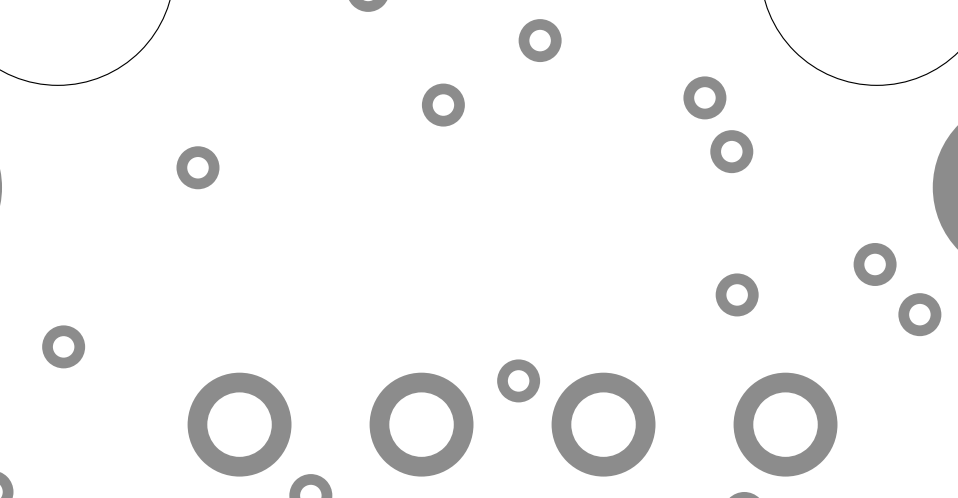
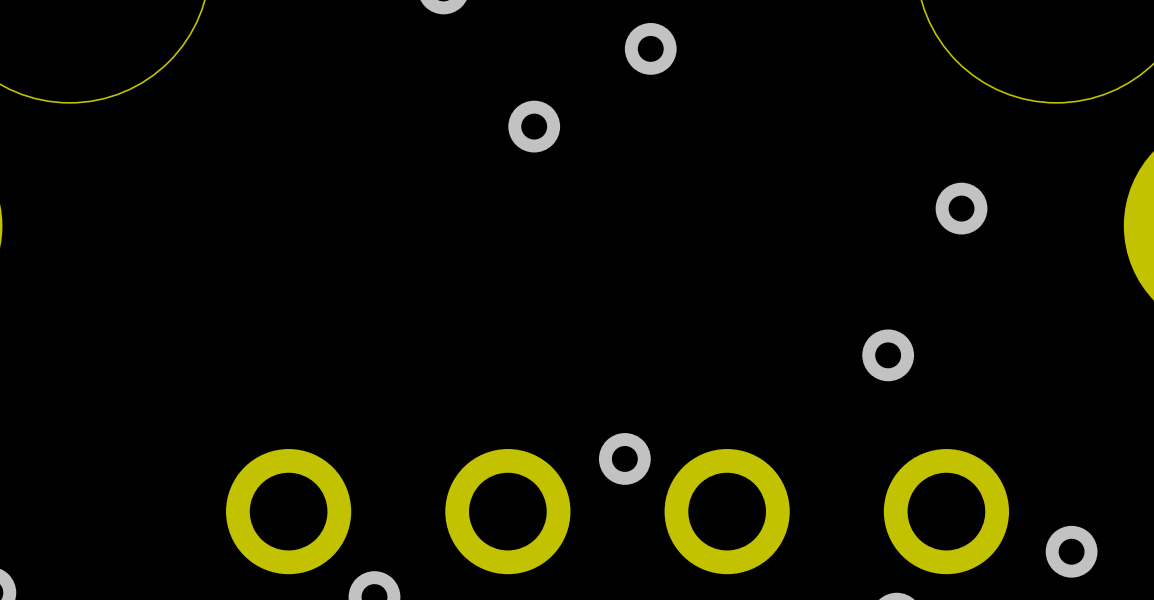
via: (704, 97) -> none
via: (731, 151) -> none
via: (197, 167) -> none
via: none -> (961, 208)
via: (875, 264) -> none
via: (919, 314) -> none
via: (63, 346) -> none
via: none -> (1071, 551)

